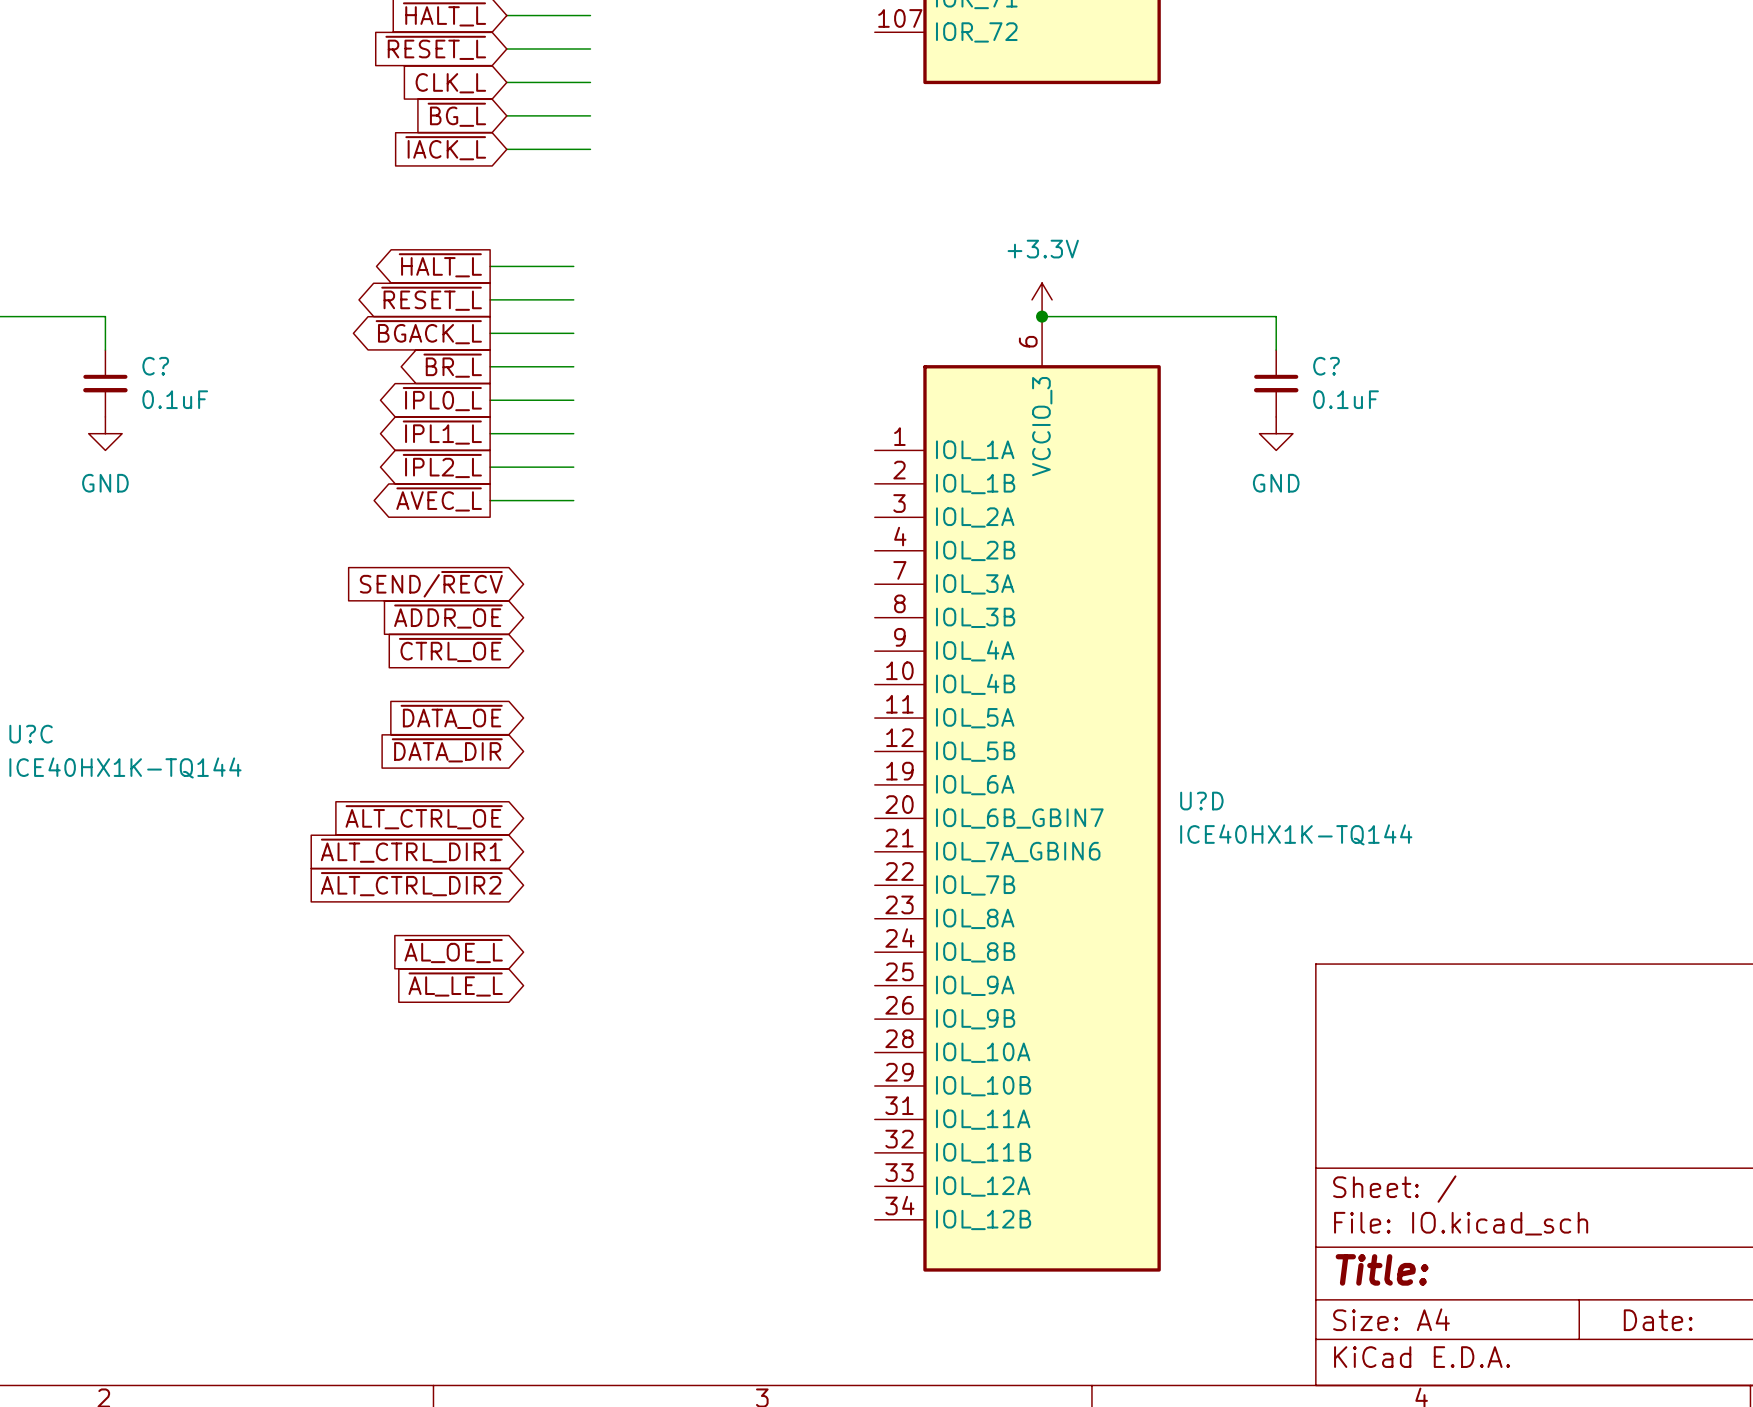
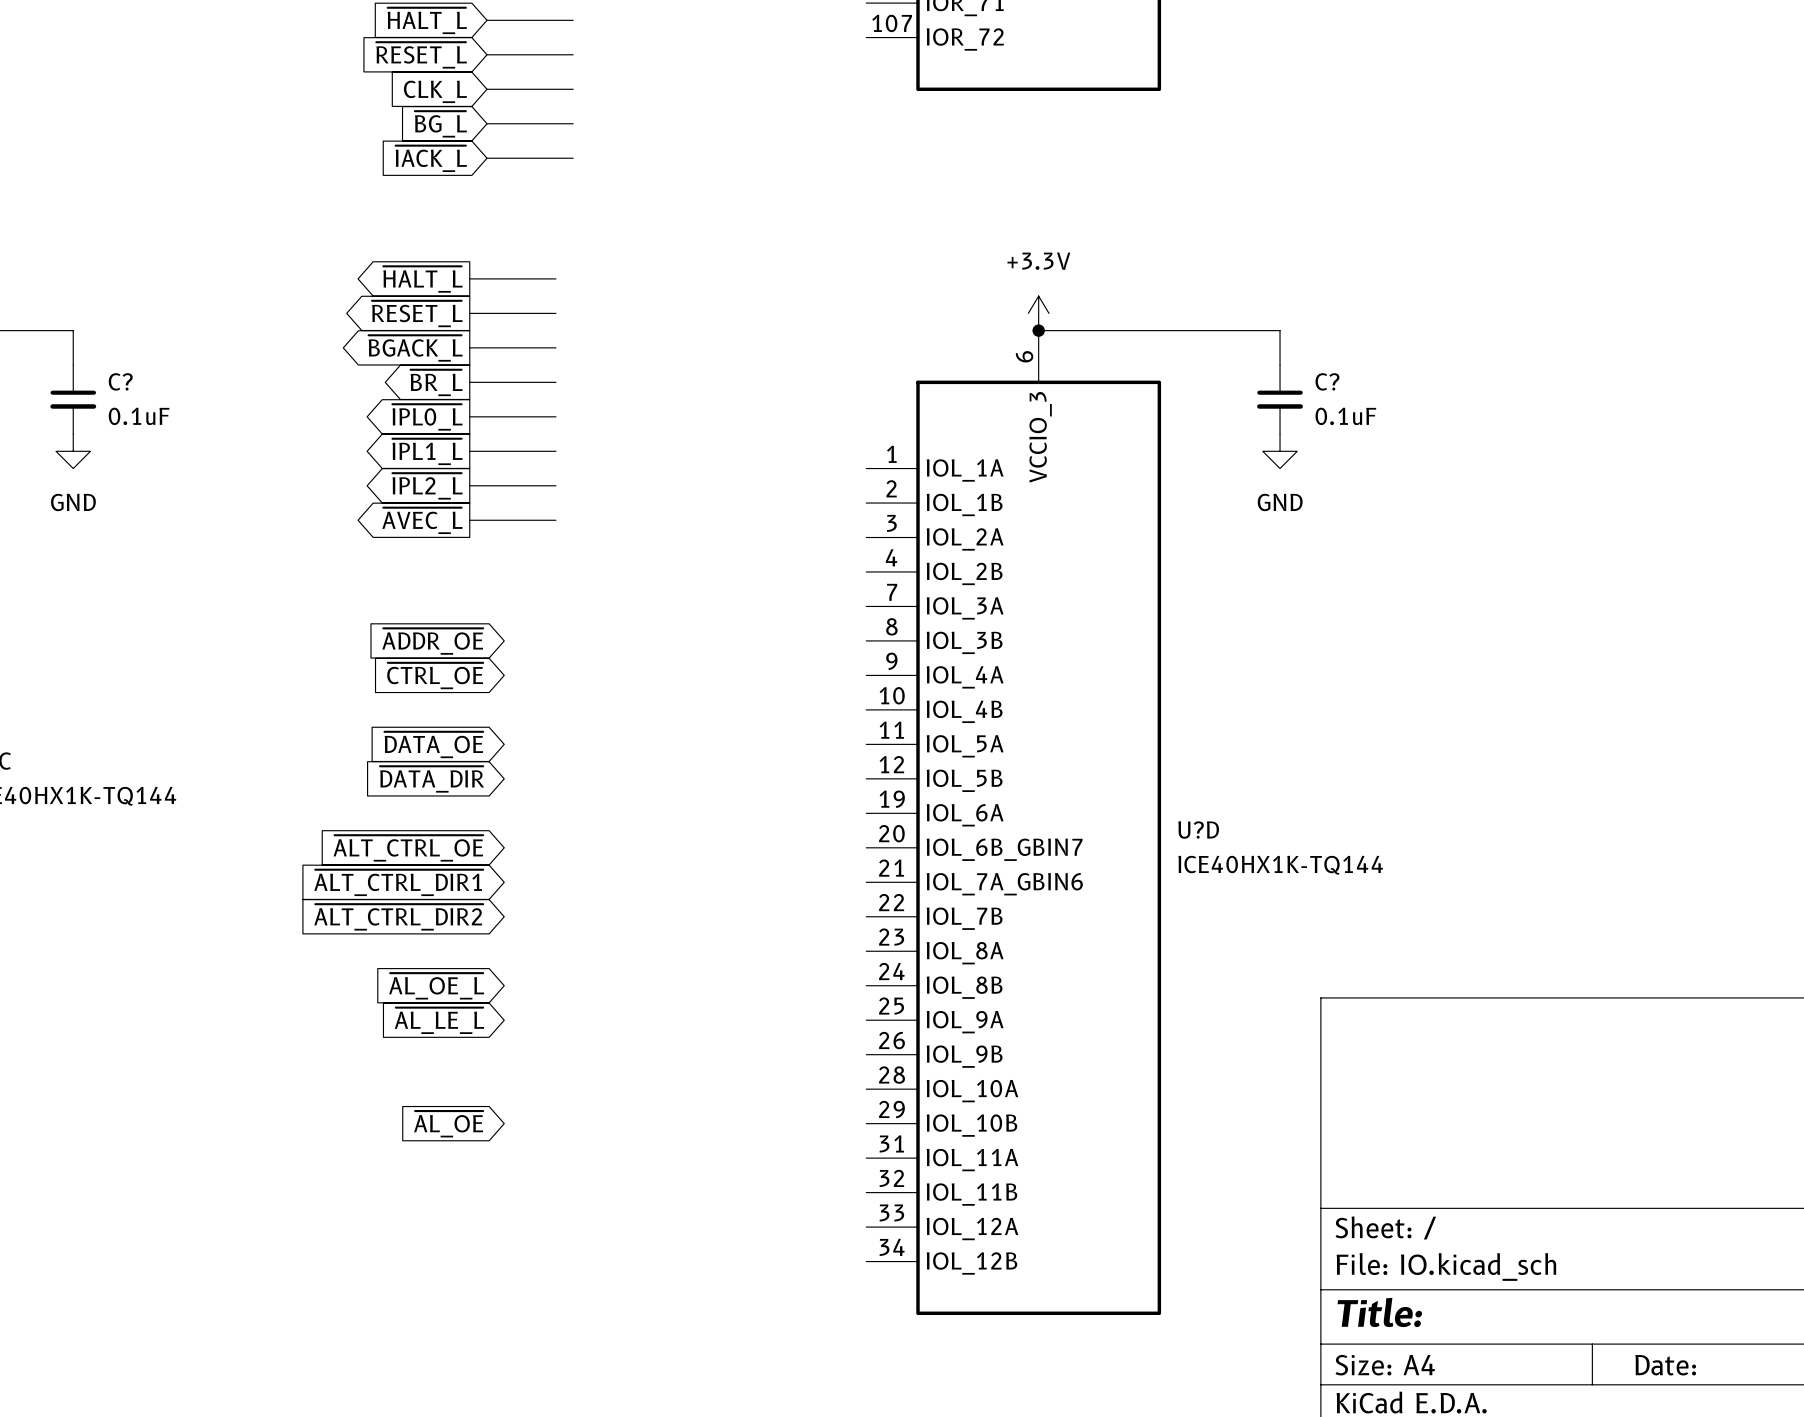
global label: SEND/~{RECV} (431, 584) -> none
global label: none -> ~{AL_OE} (448, 1124)

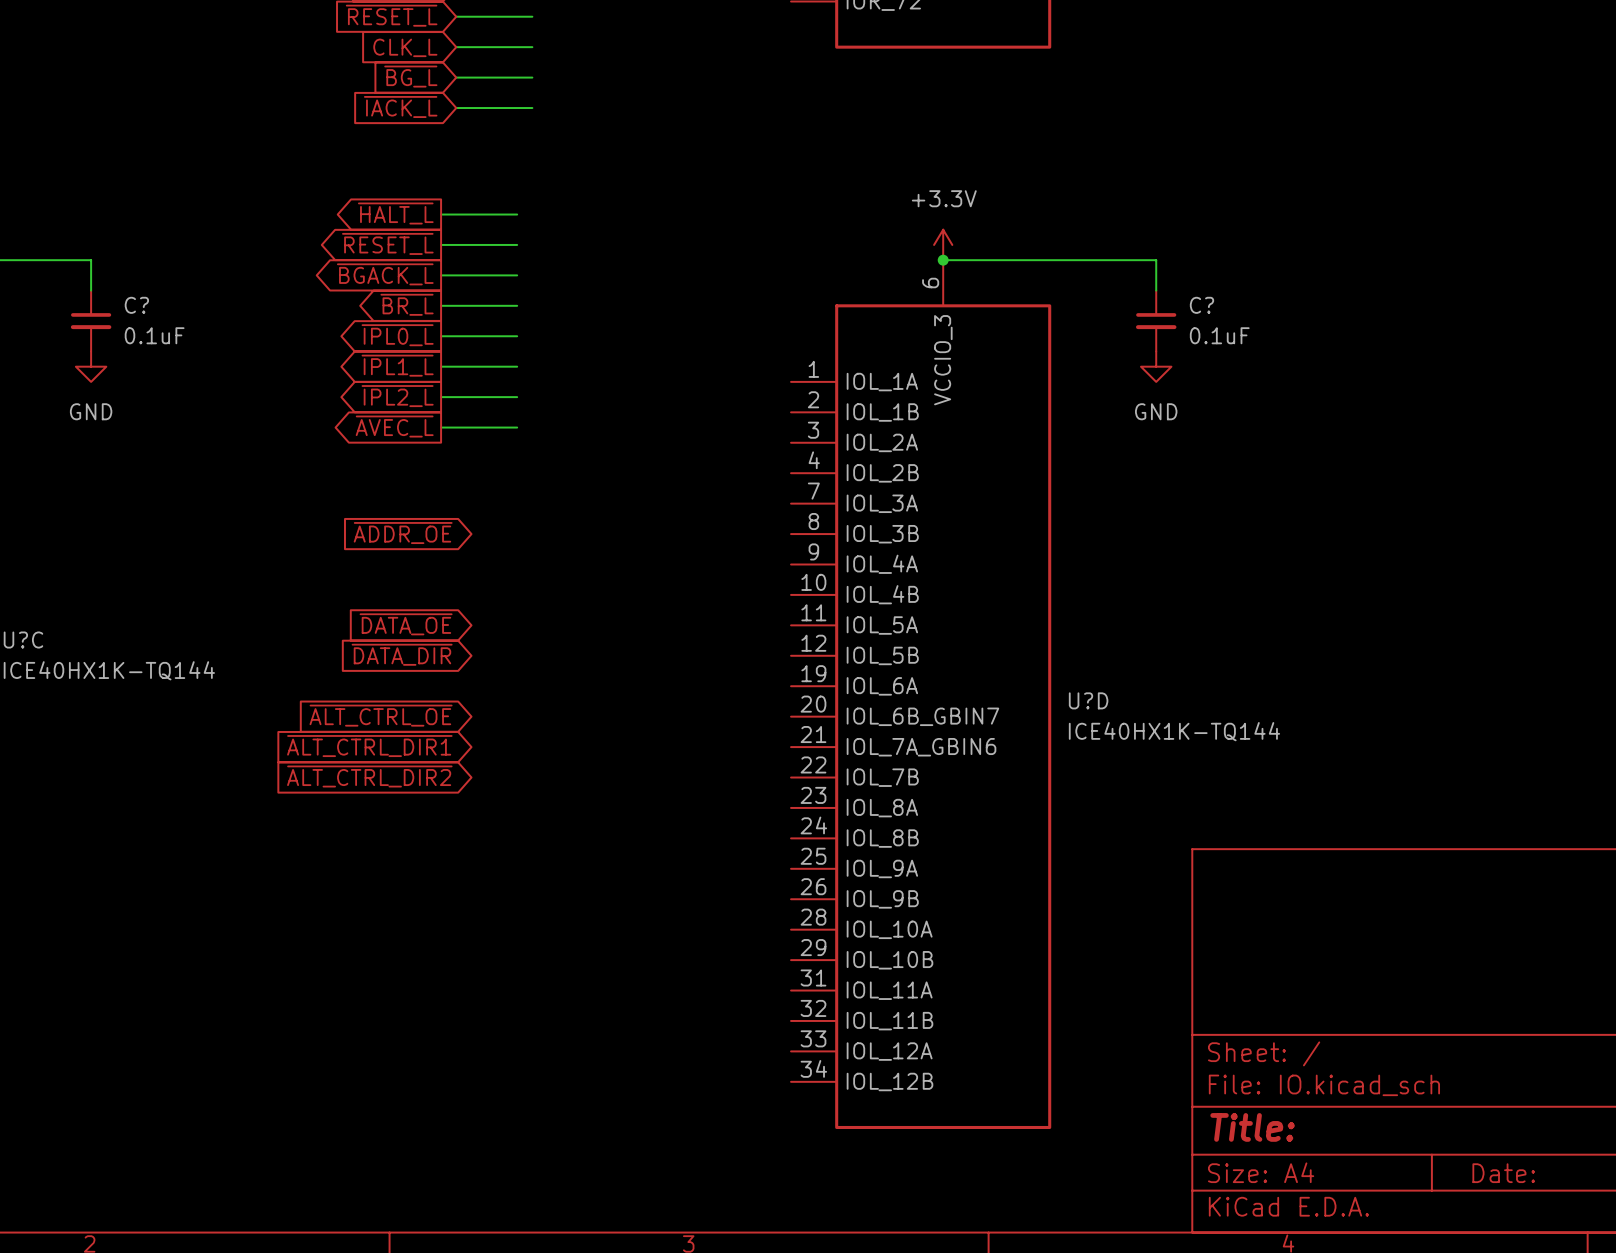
global label: ~{CTRL_OE} (435, 676) -> none
global label: ~{AL_OE_L} (436, 986) -> none
global label: ~{AL_LE_L} (439, 1020) -> none
global label: ~{AL_OE} (448, 1124) -> none

